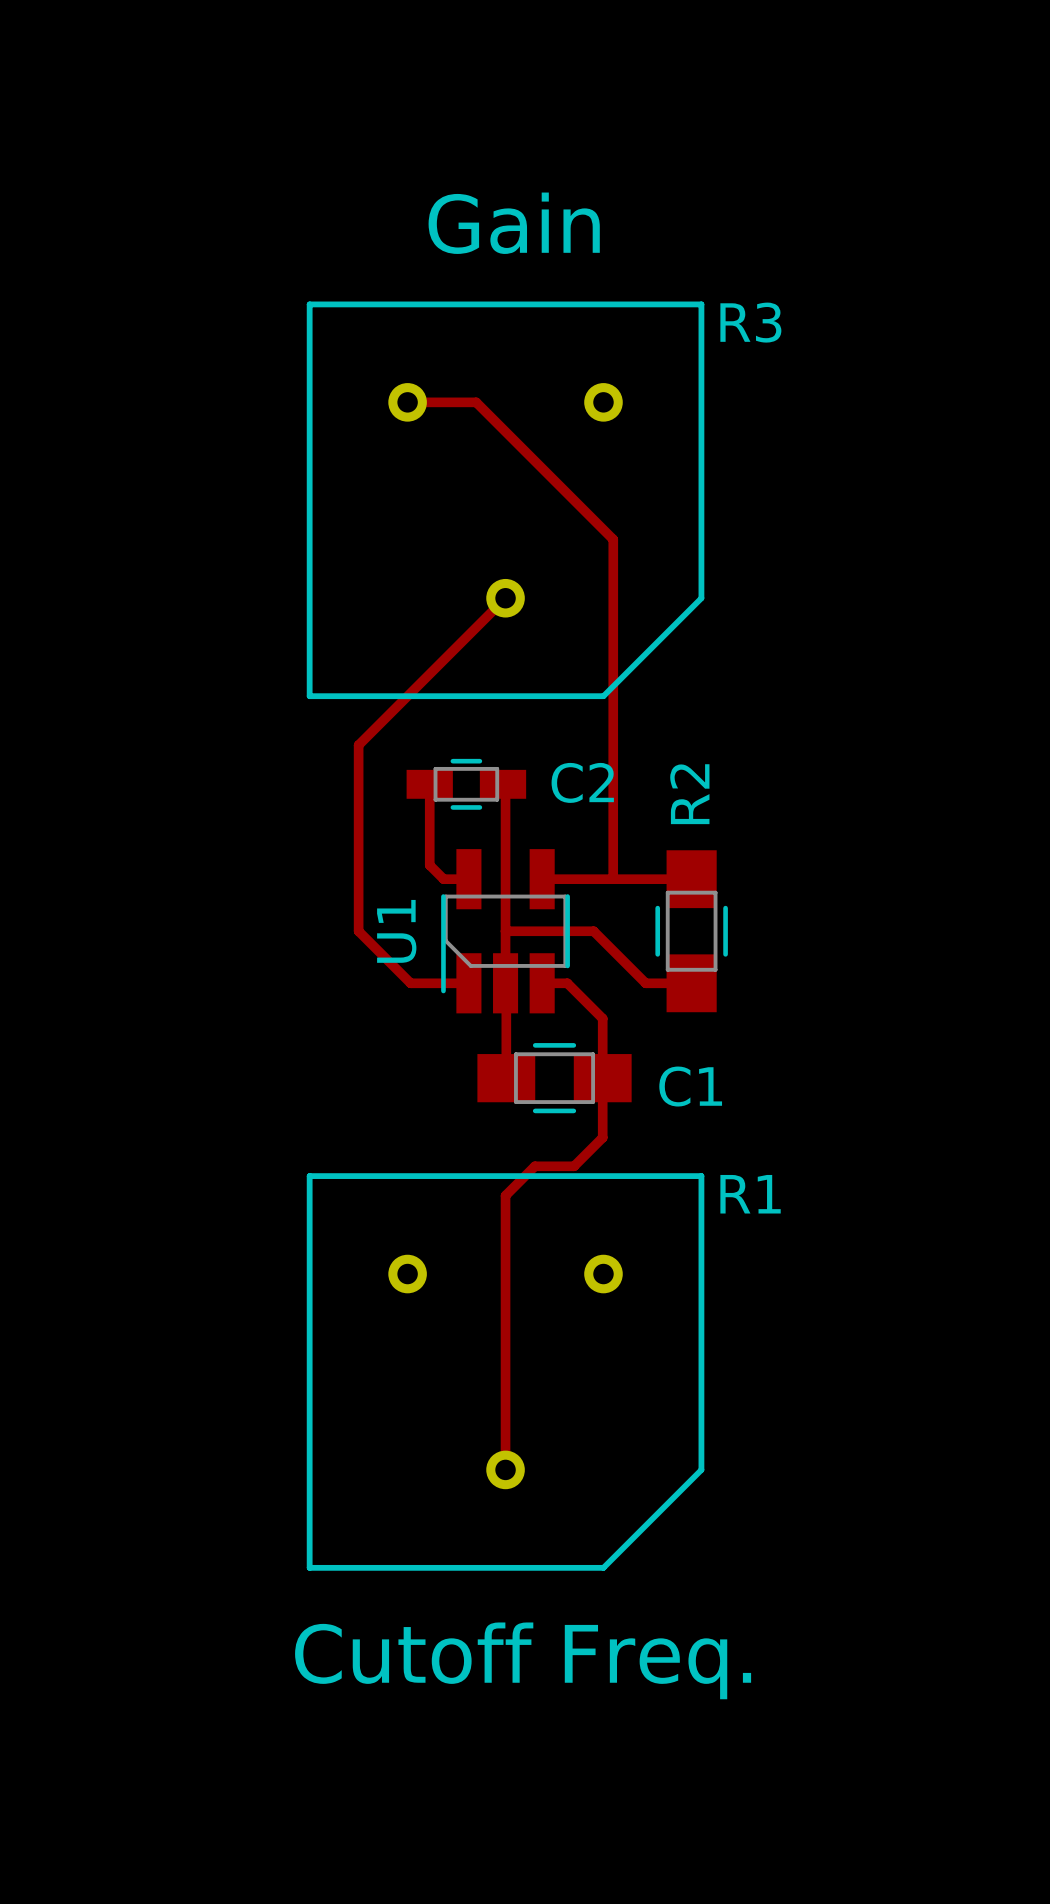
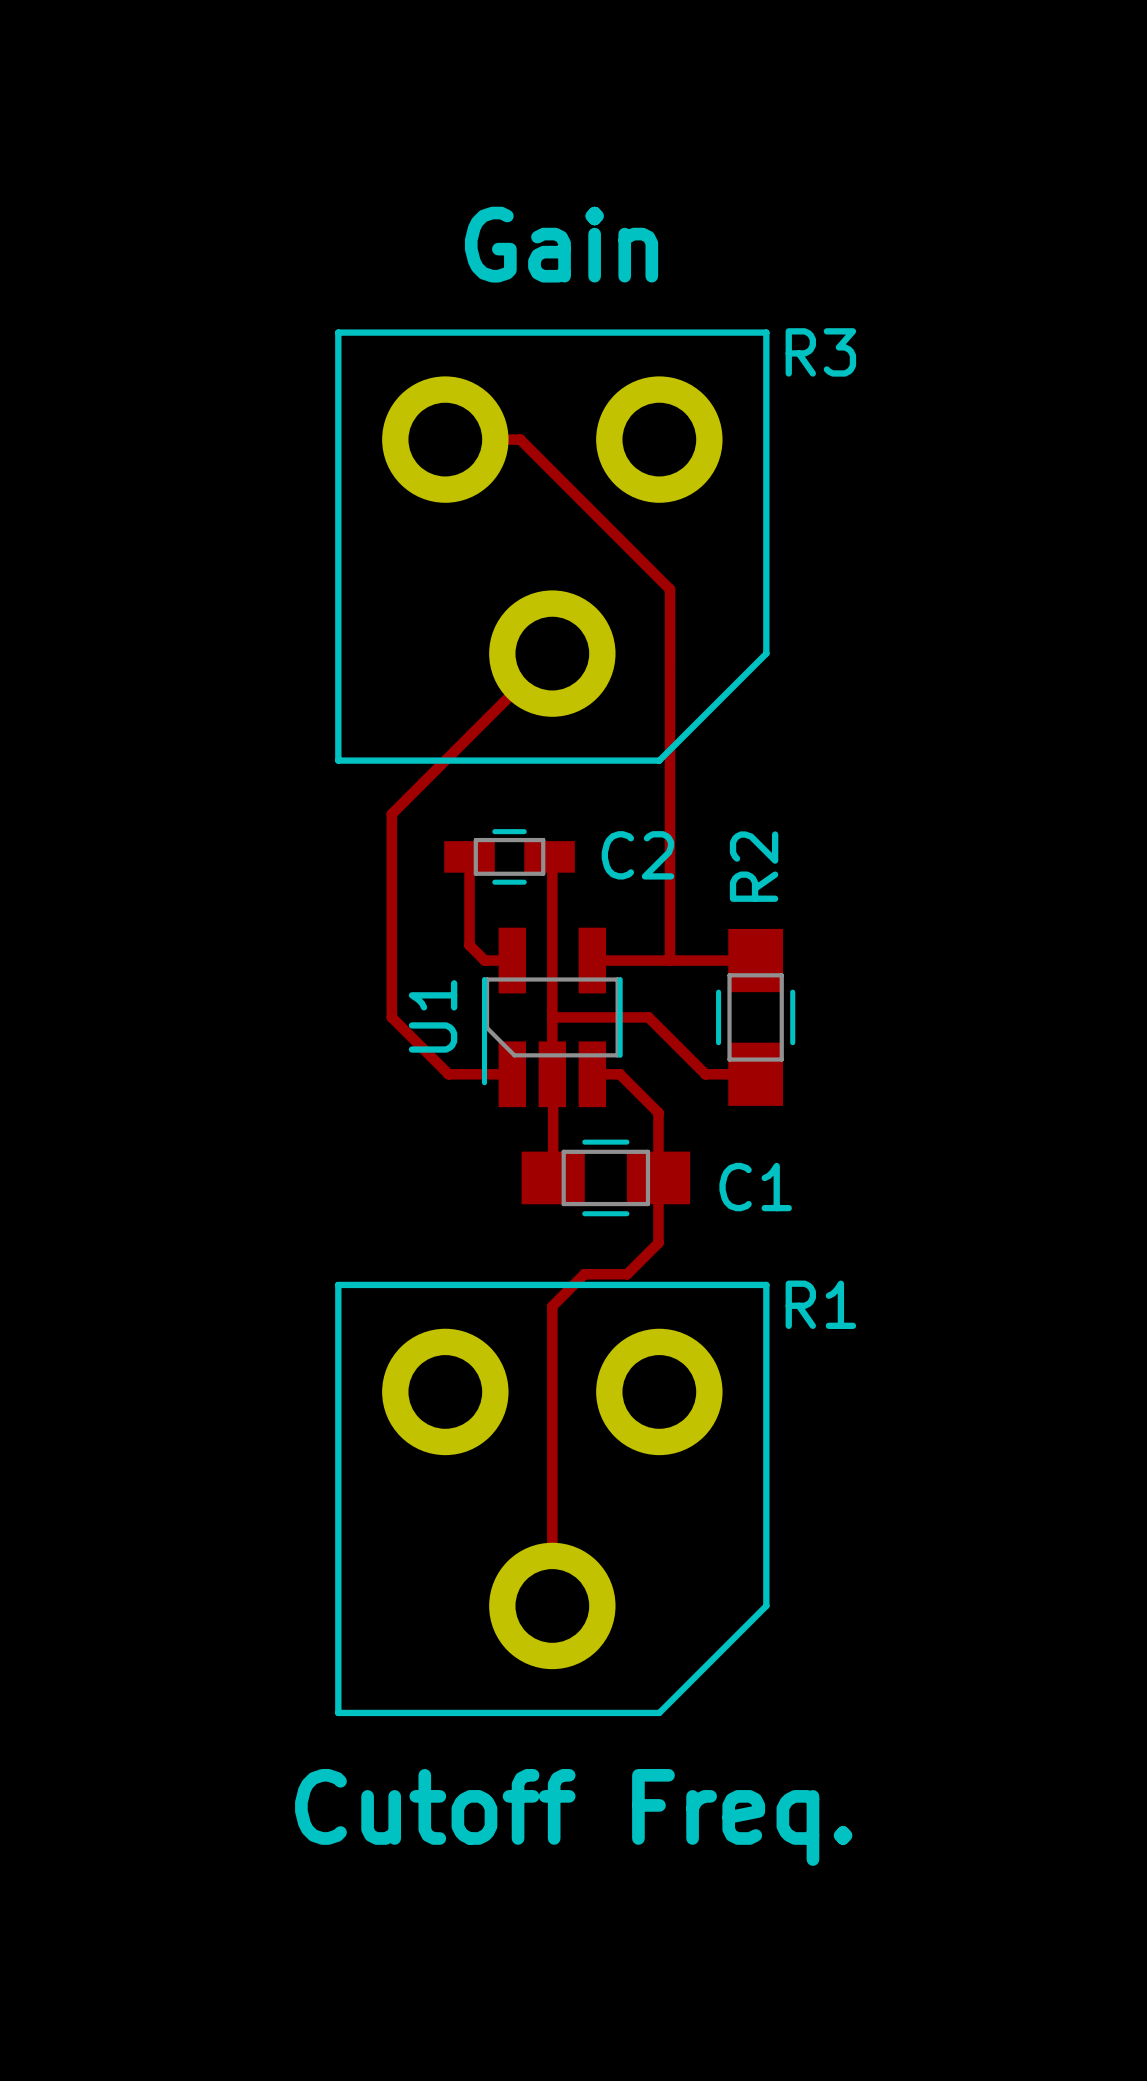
R3 footprint: [306, 301, 705, 700] -> [335, 329, 770, 764]
R1 footprint: [306, 1173, 705, 1571] -> [335, 1281, 770, 1717]

